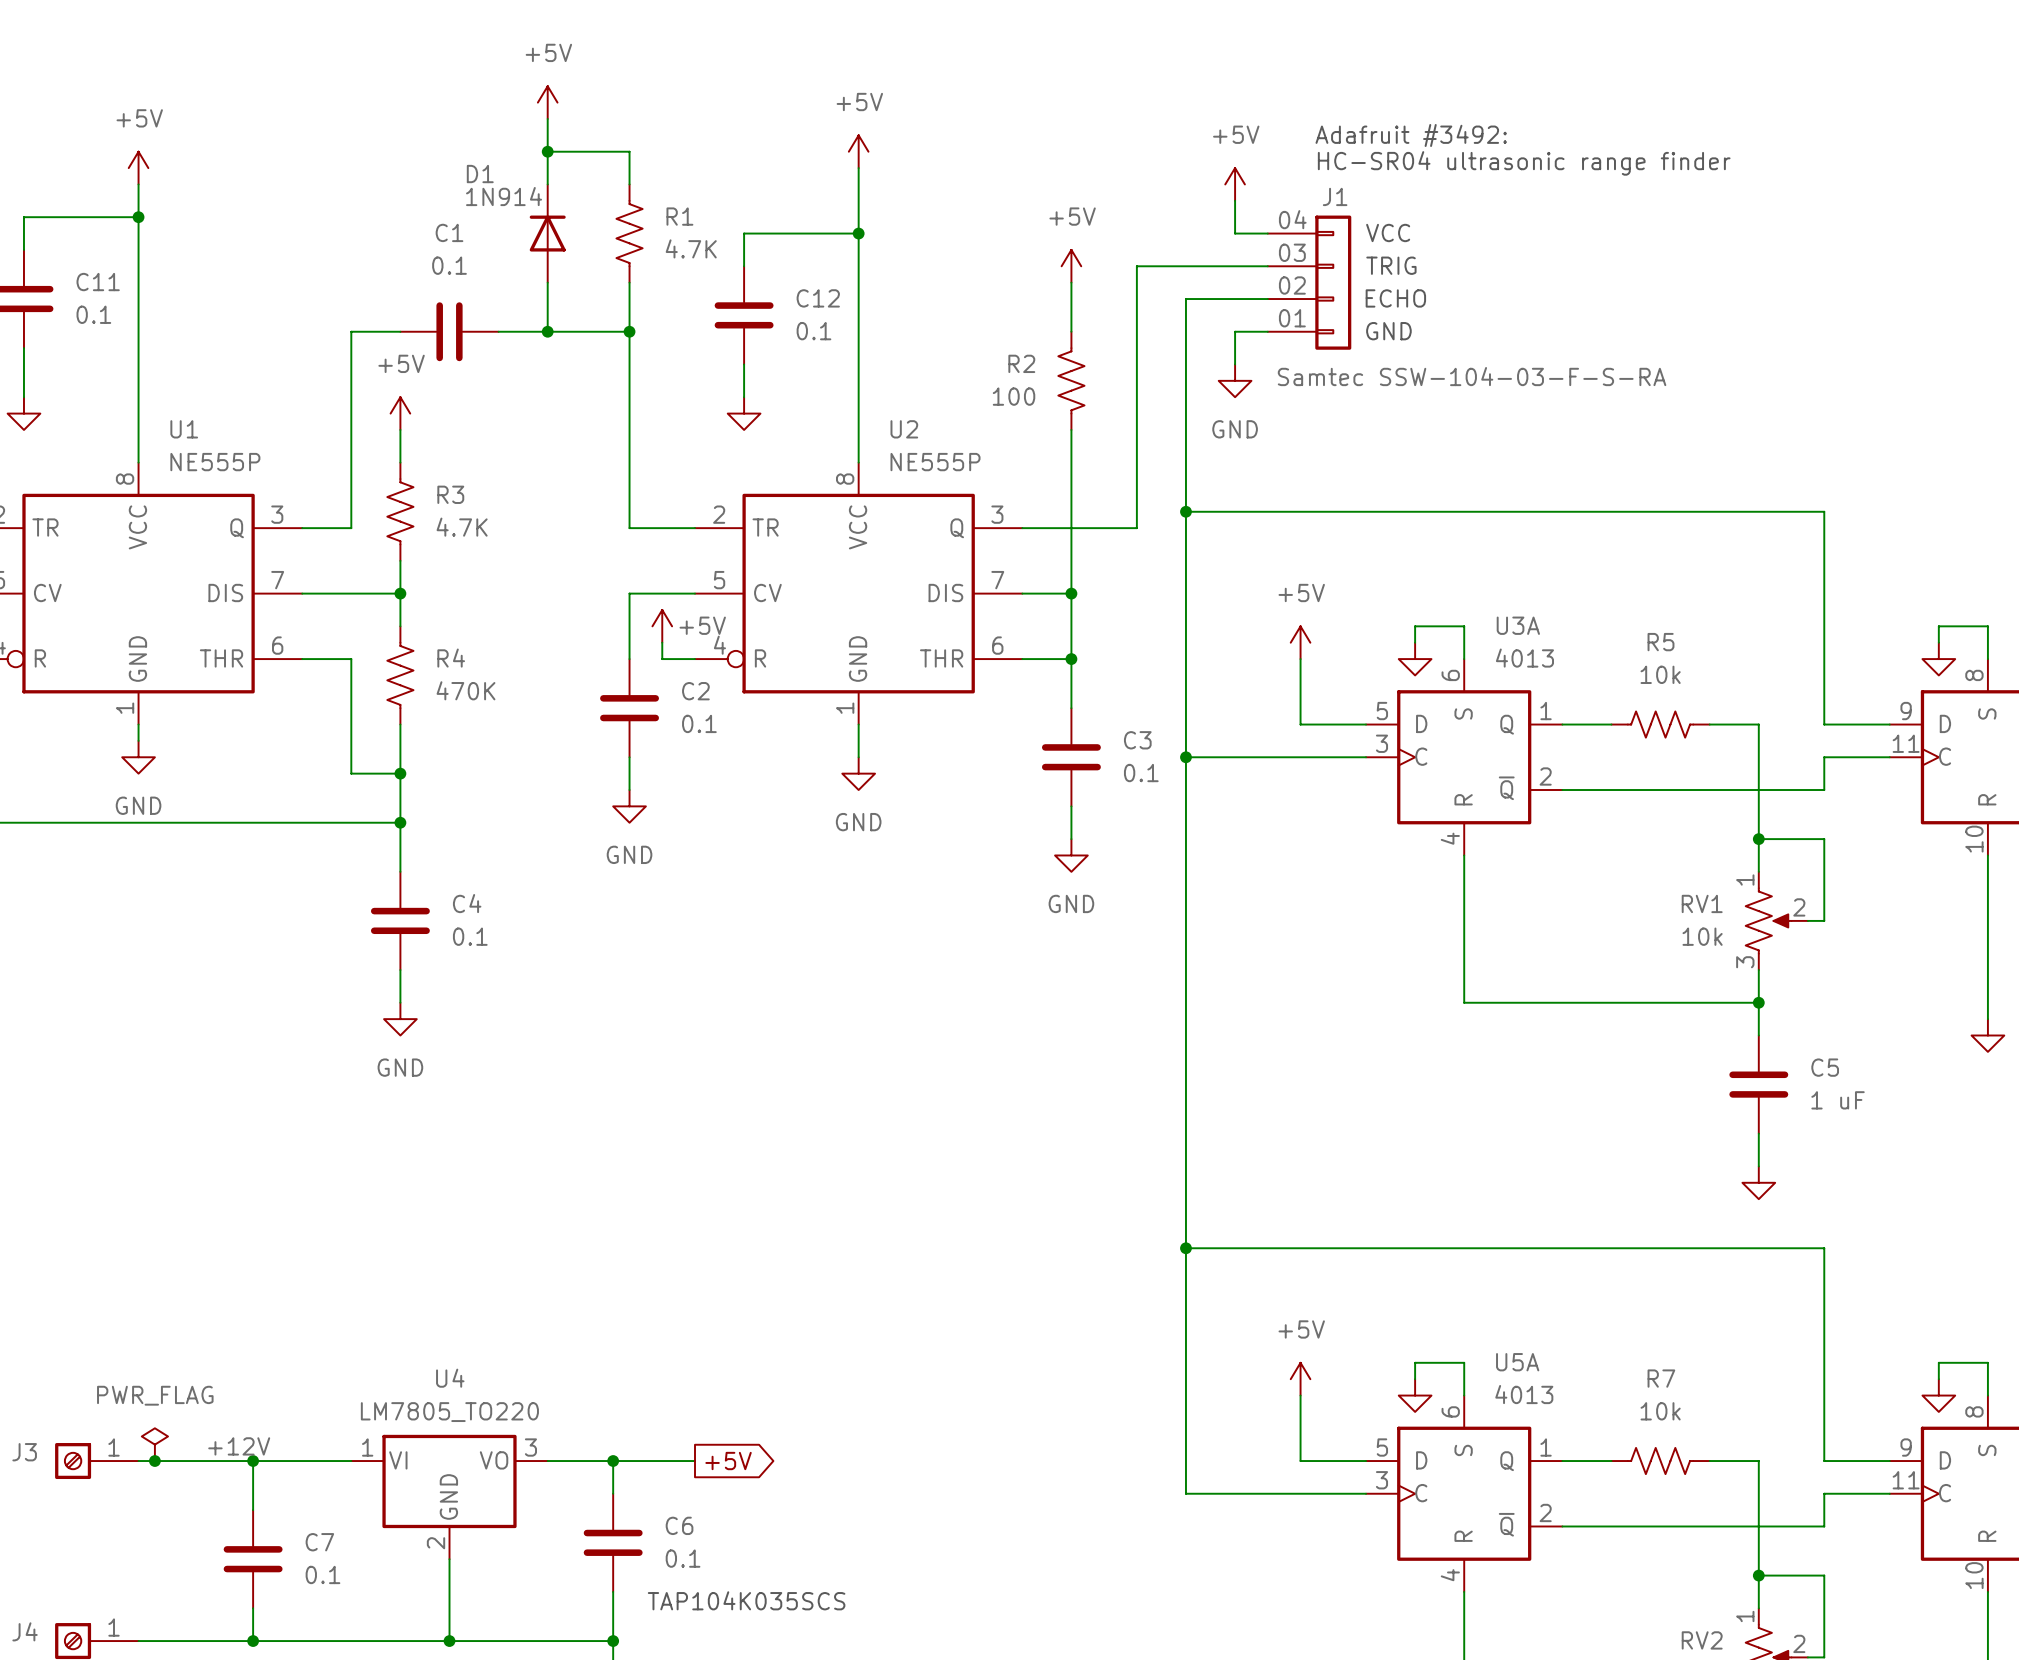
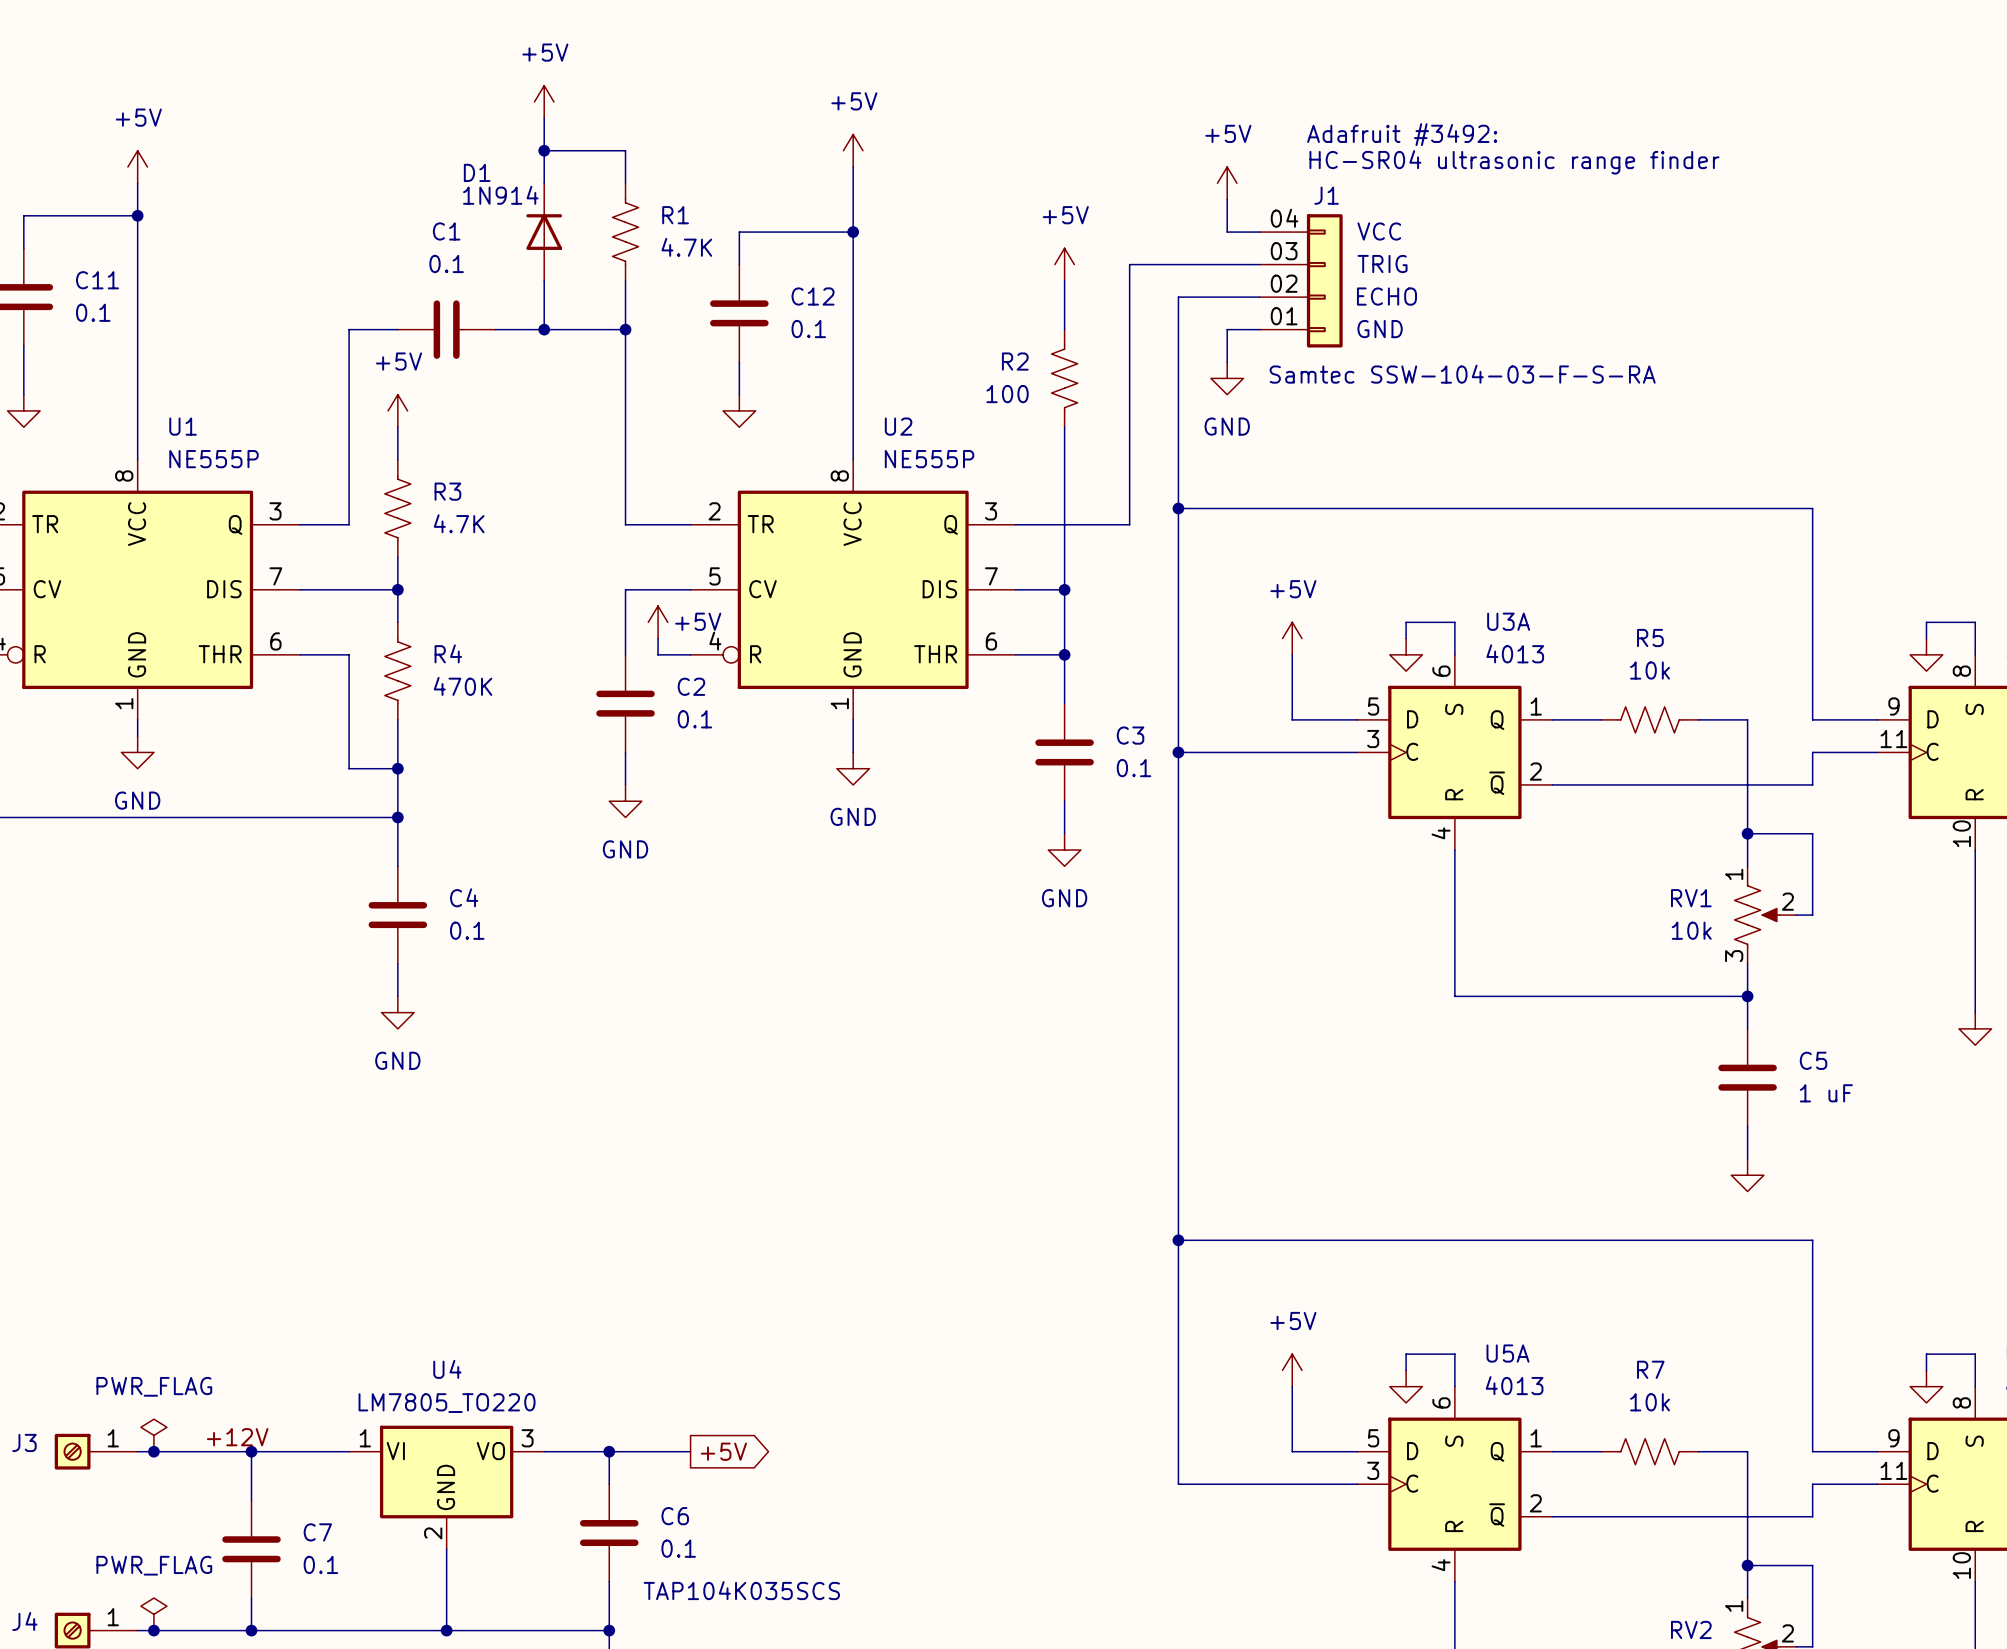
power symbol: none -> PWR_FLAG (153, 1614)
junction: none -> (153, 1630)

